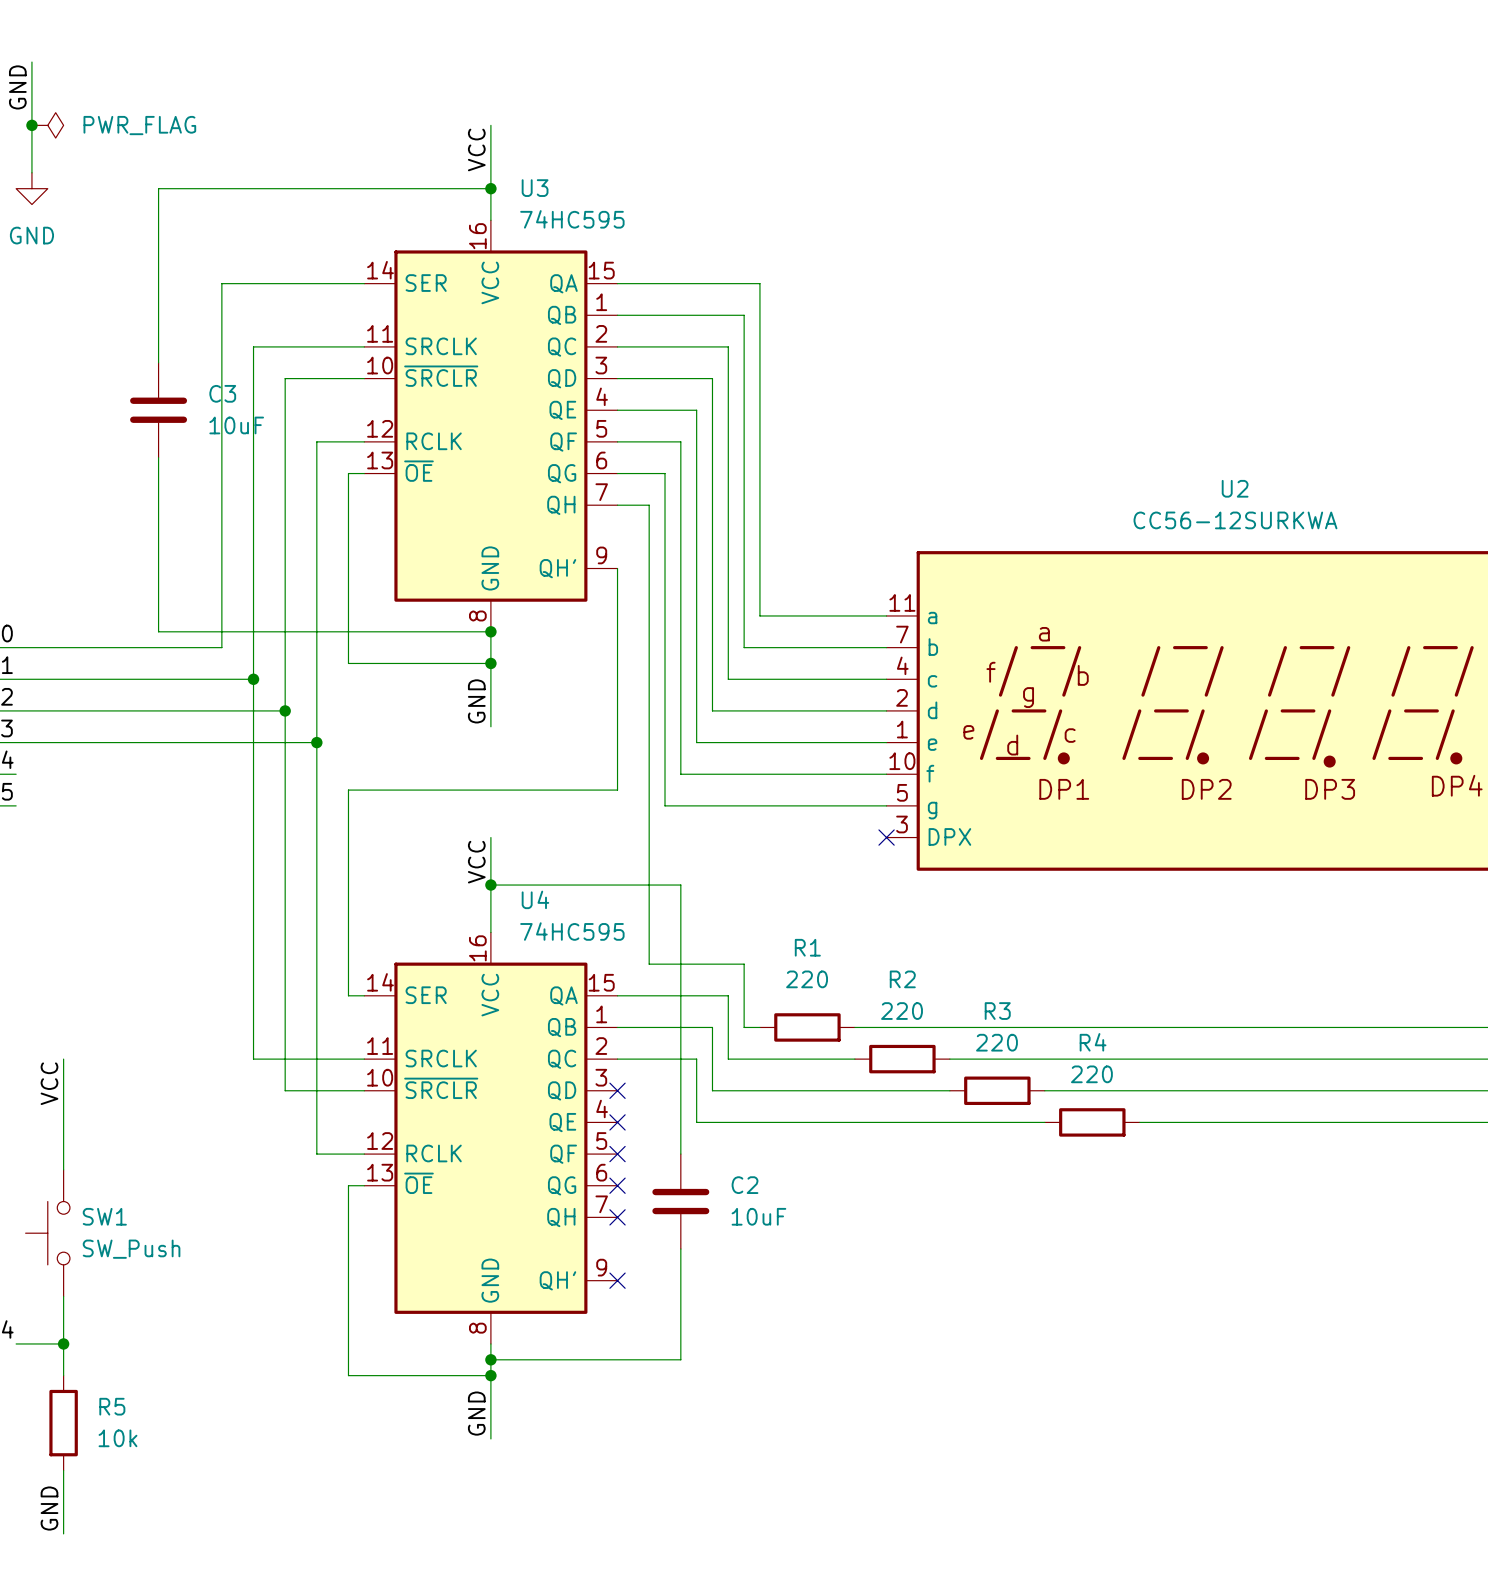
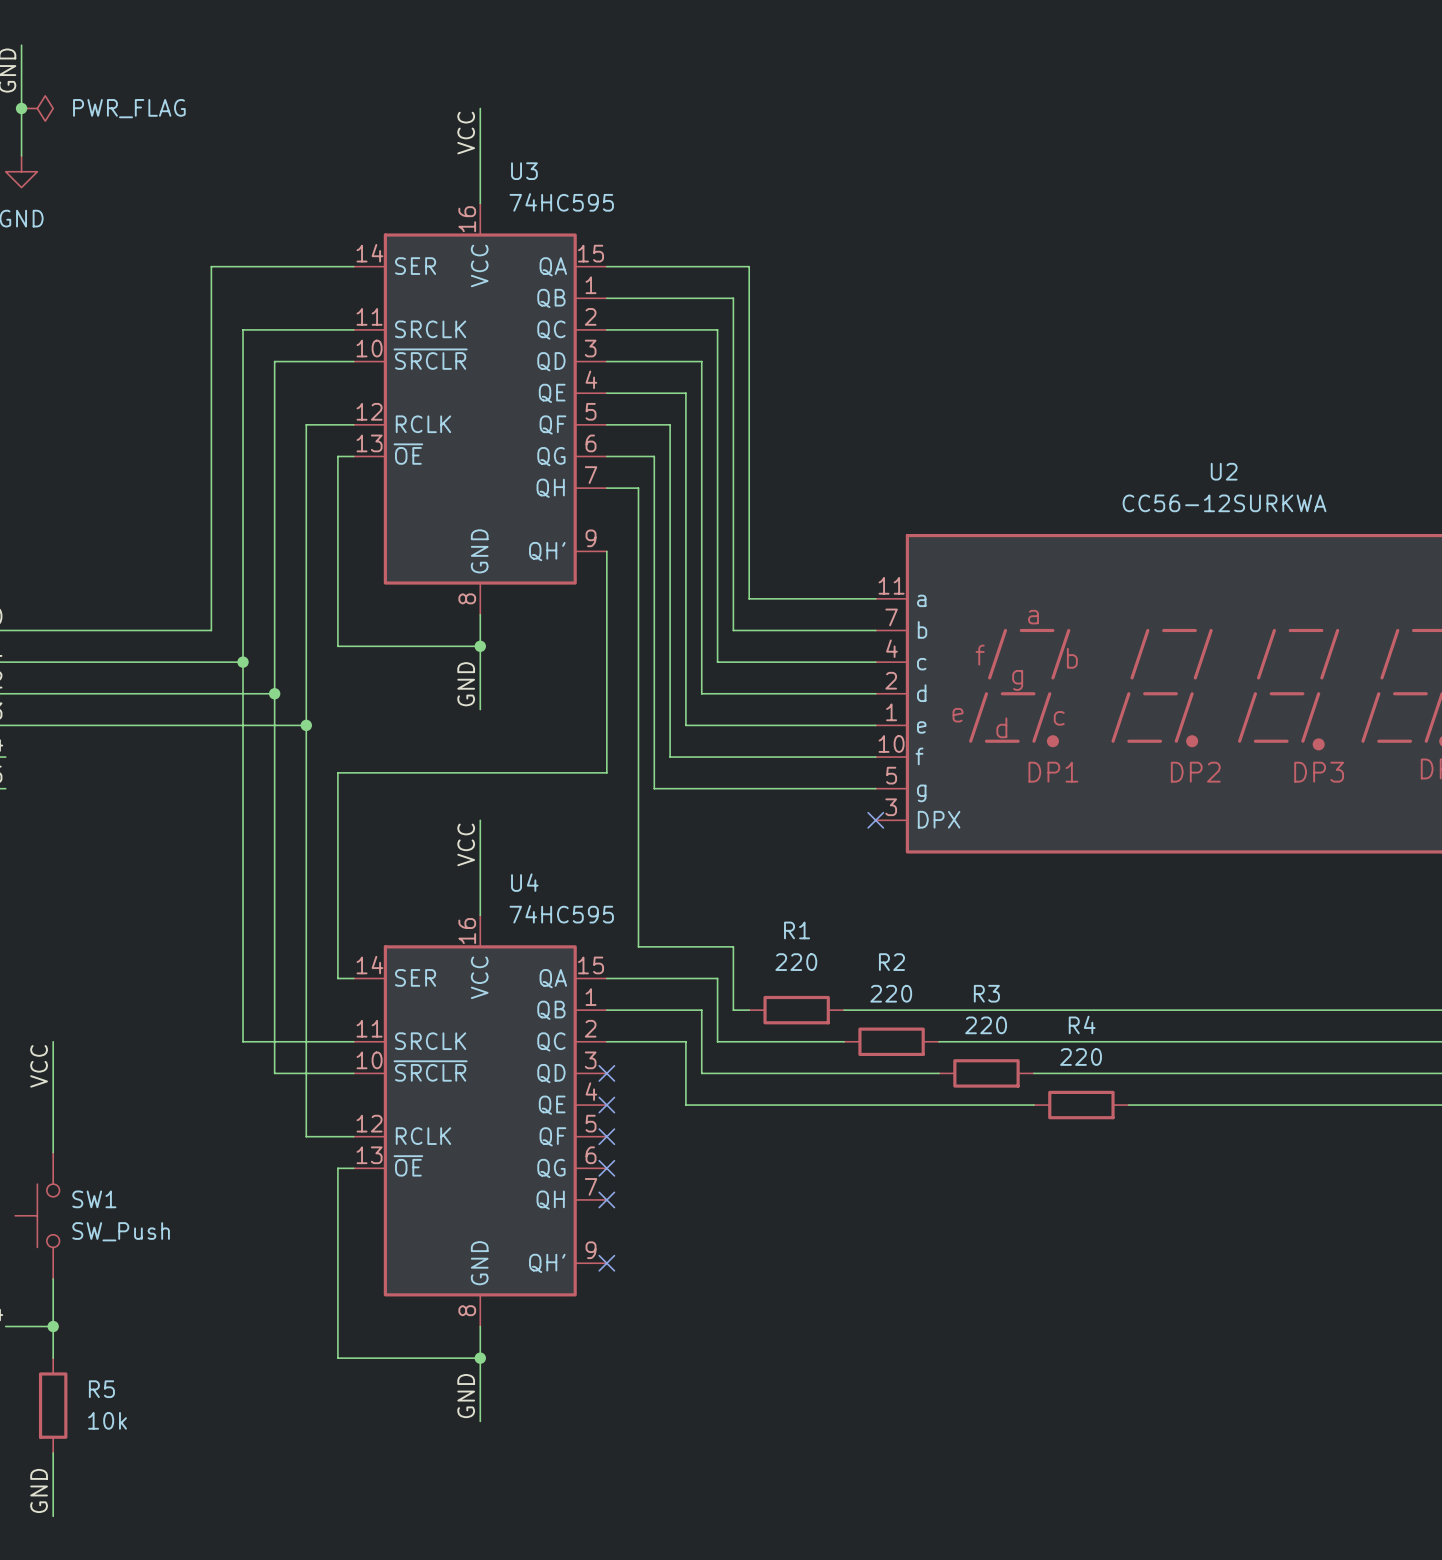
wire: (490, 188) (158, 188) (158, 362) -> none
junction: (490, 188) -> none
C3: 10uF (158, 410) -> none
wire: (158, 457) (158, 631) (490, 631) -> none
junction: (490, 631) -> none
wire: (490, 885) (680, 885) (680, 1154) -> none
junction: (490, 885) -> none
C2: 10uF (680, 1201) -> none
wire: (680, 1249) (680, 1359) (490, 1359) -> none
junction: (490, 1359) -> none

